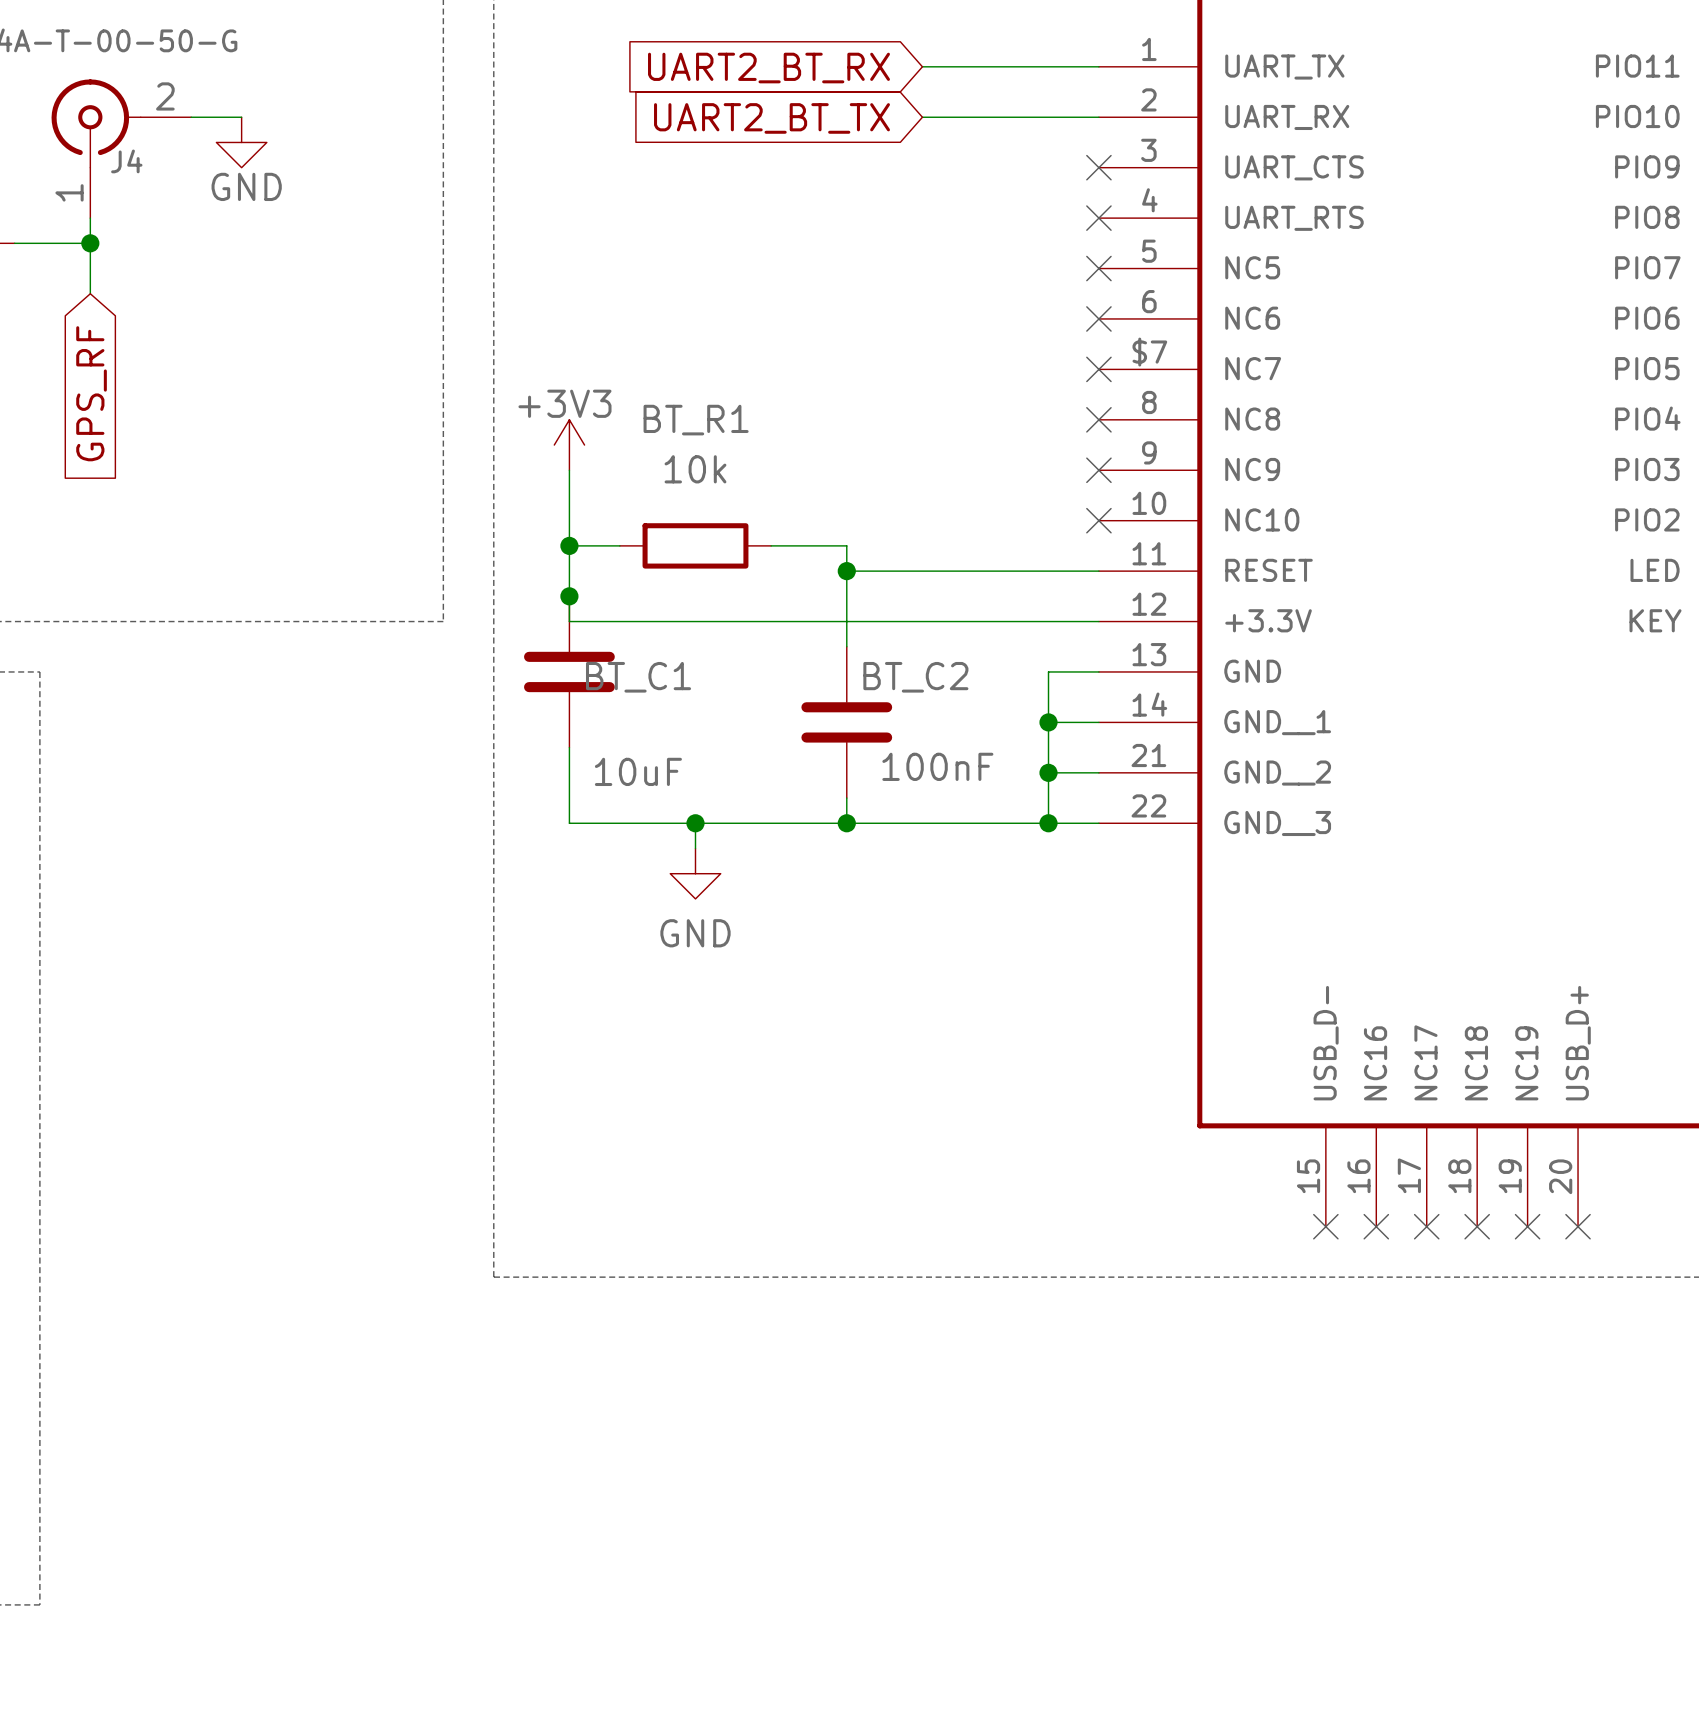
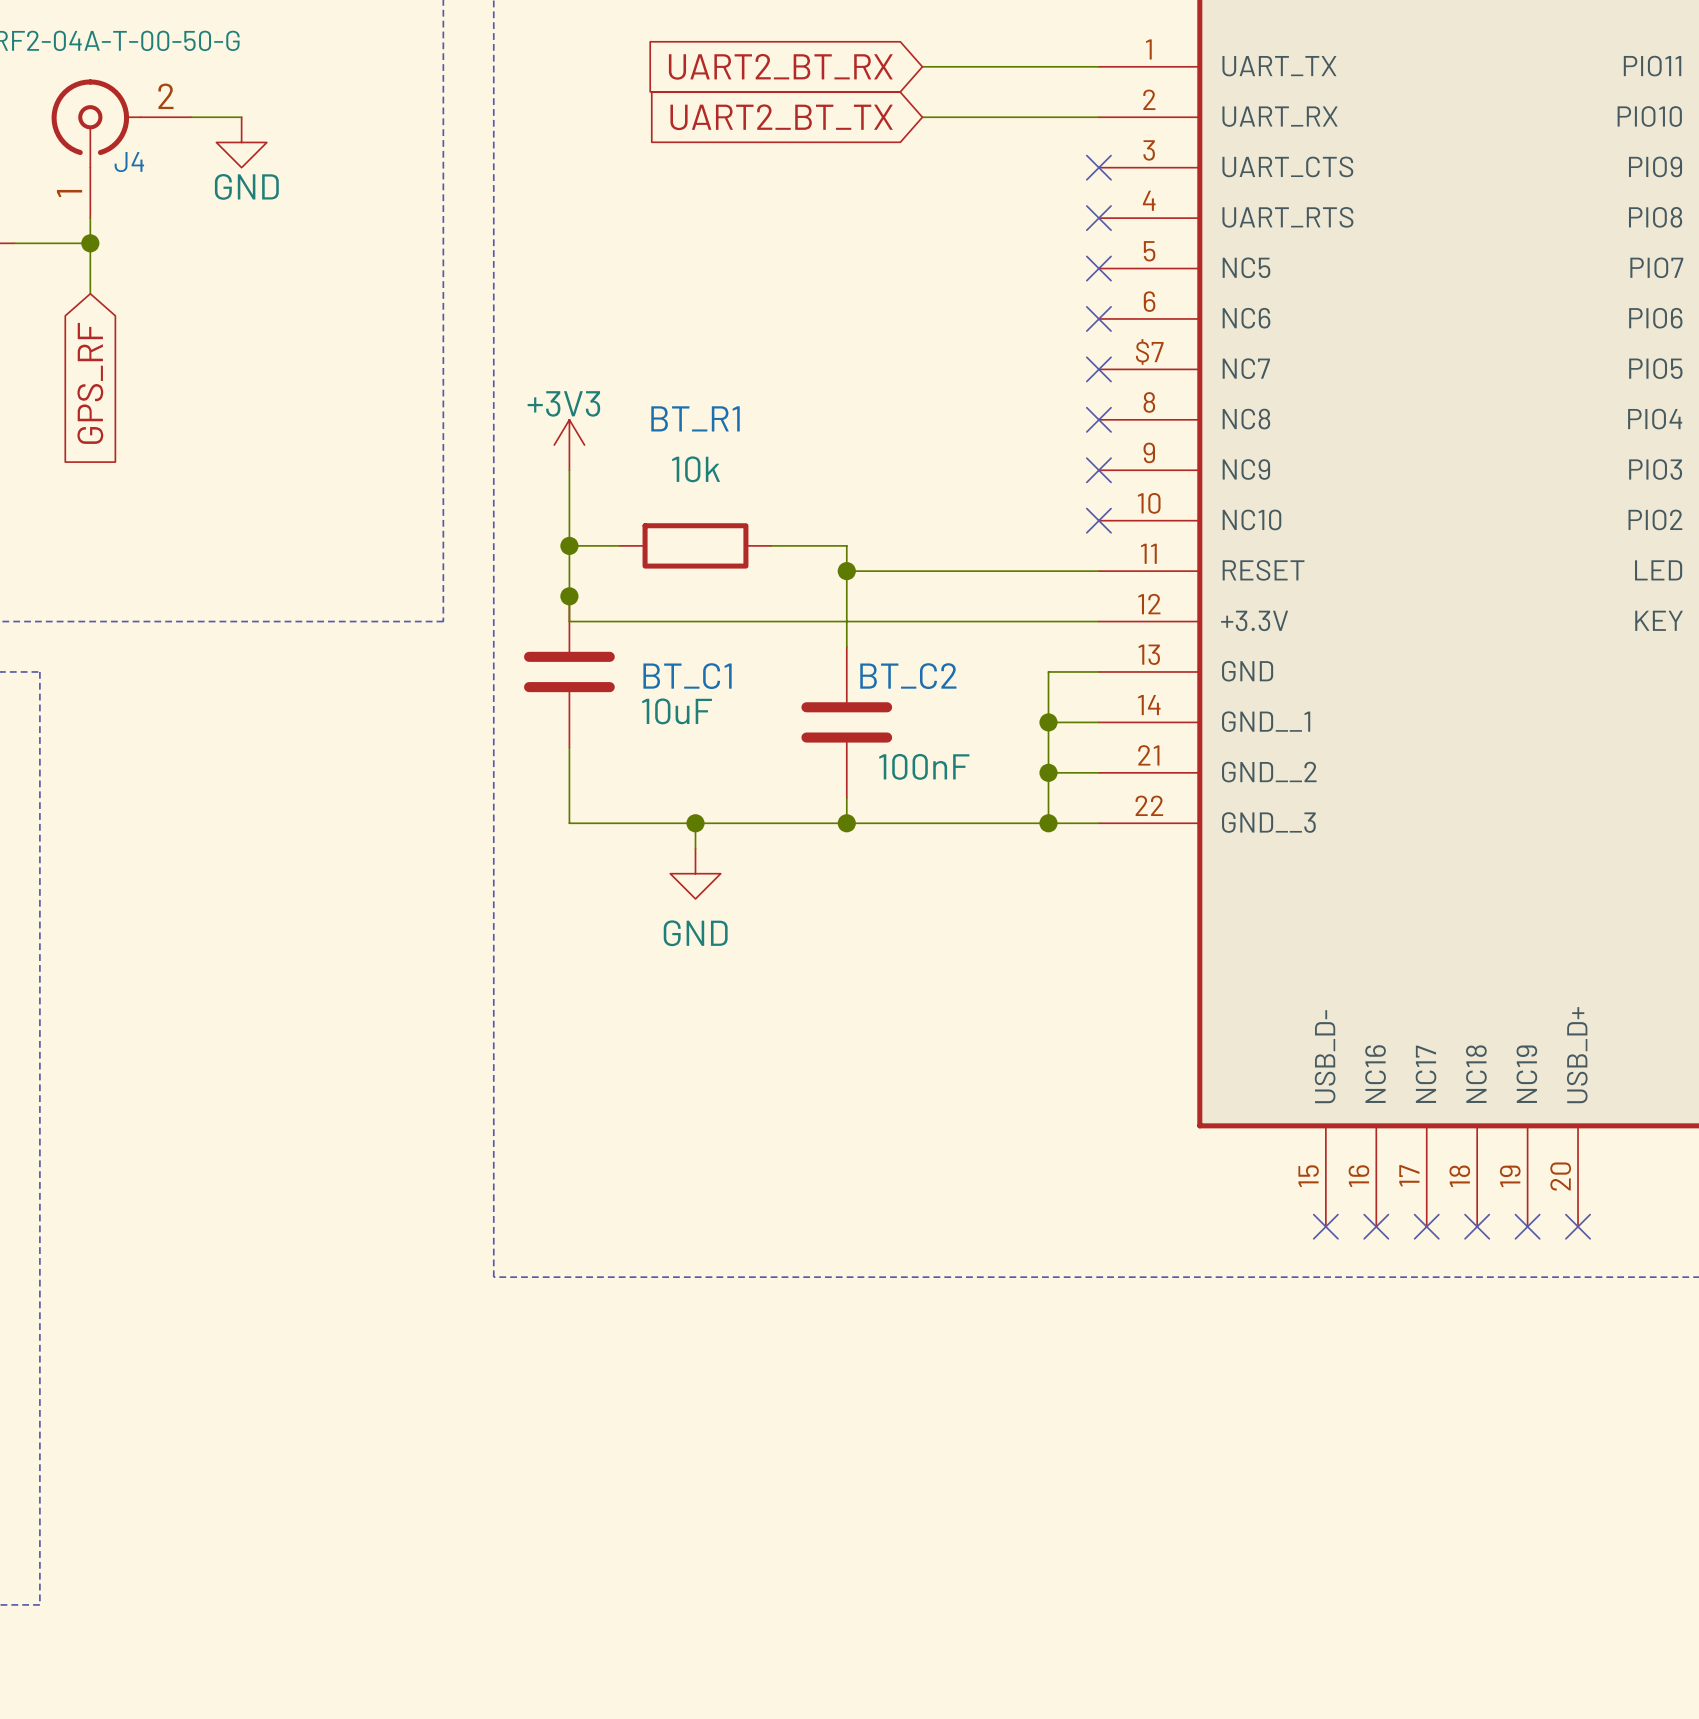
BT_C1 name position: BT_C1 (638, 677) -> BT_C1 (687, 676)
BT_C1 value position: 10uF (638, 771) -> 10uF (677, 711)

